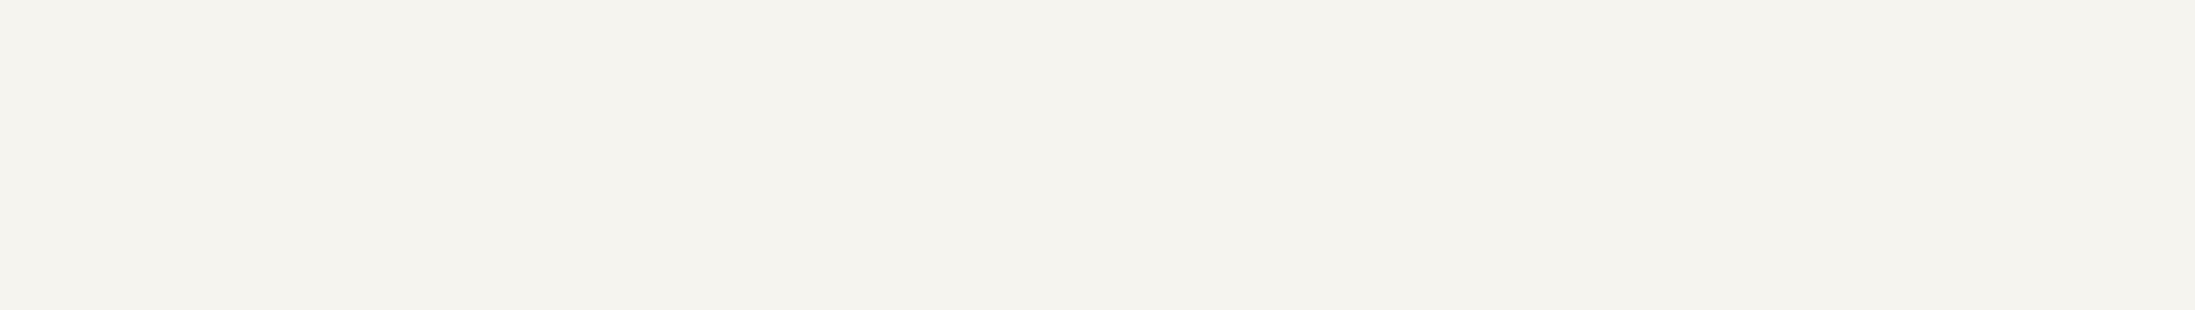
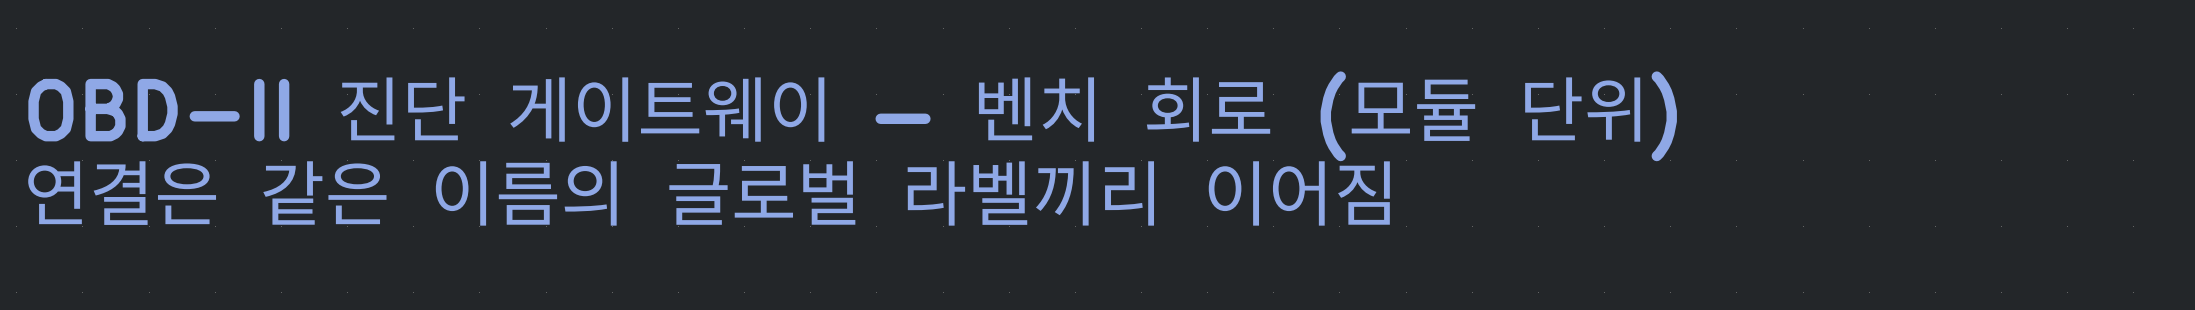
text: none -> OBD-II 진단 게이트웨이 — 벤치 회로 (모듈 단위) (852, 116)
text: none -> 연결은 같은 이름의 글로벌 라벨끼리 이어짐 (709, 193)

